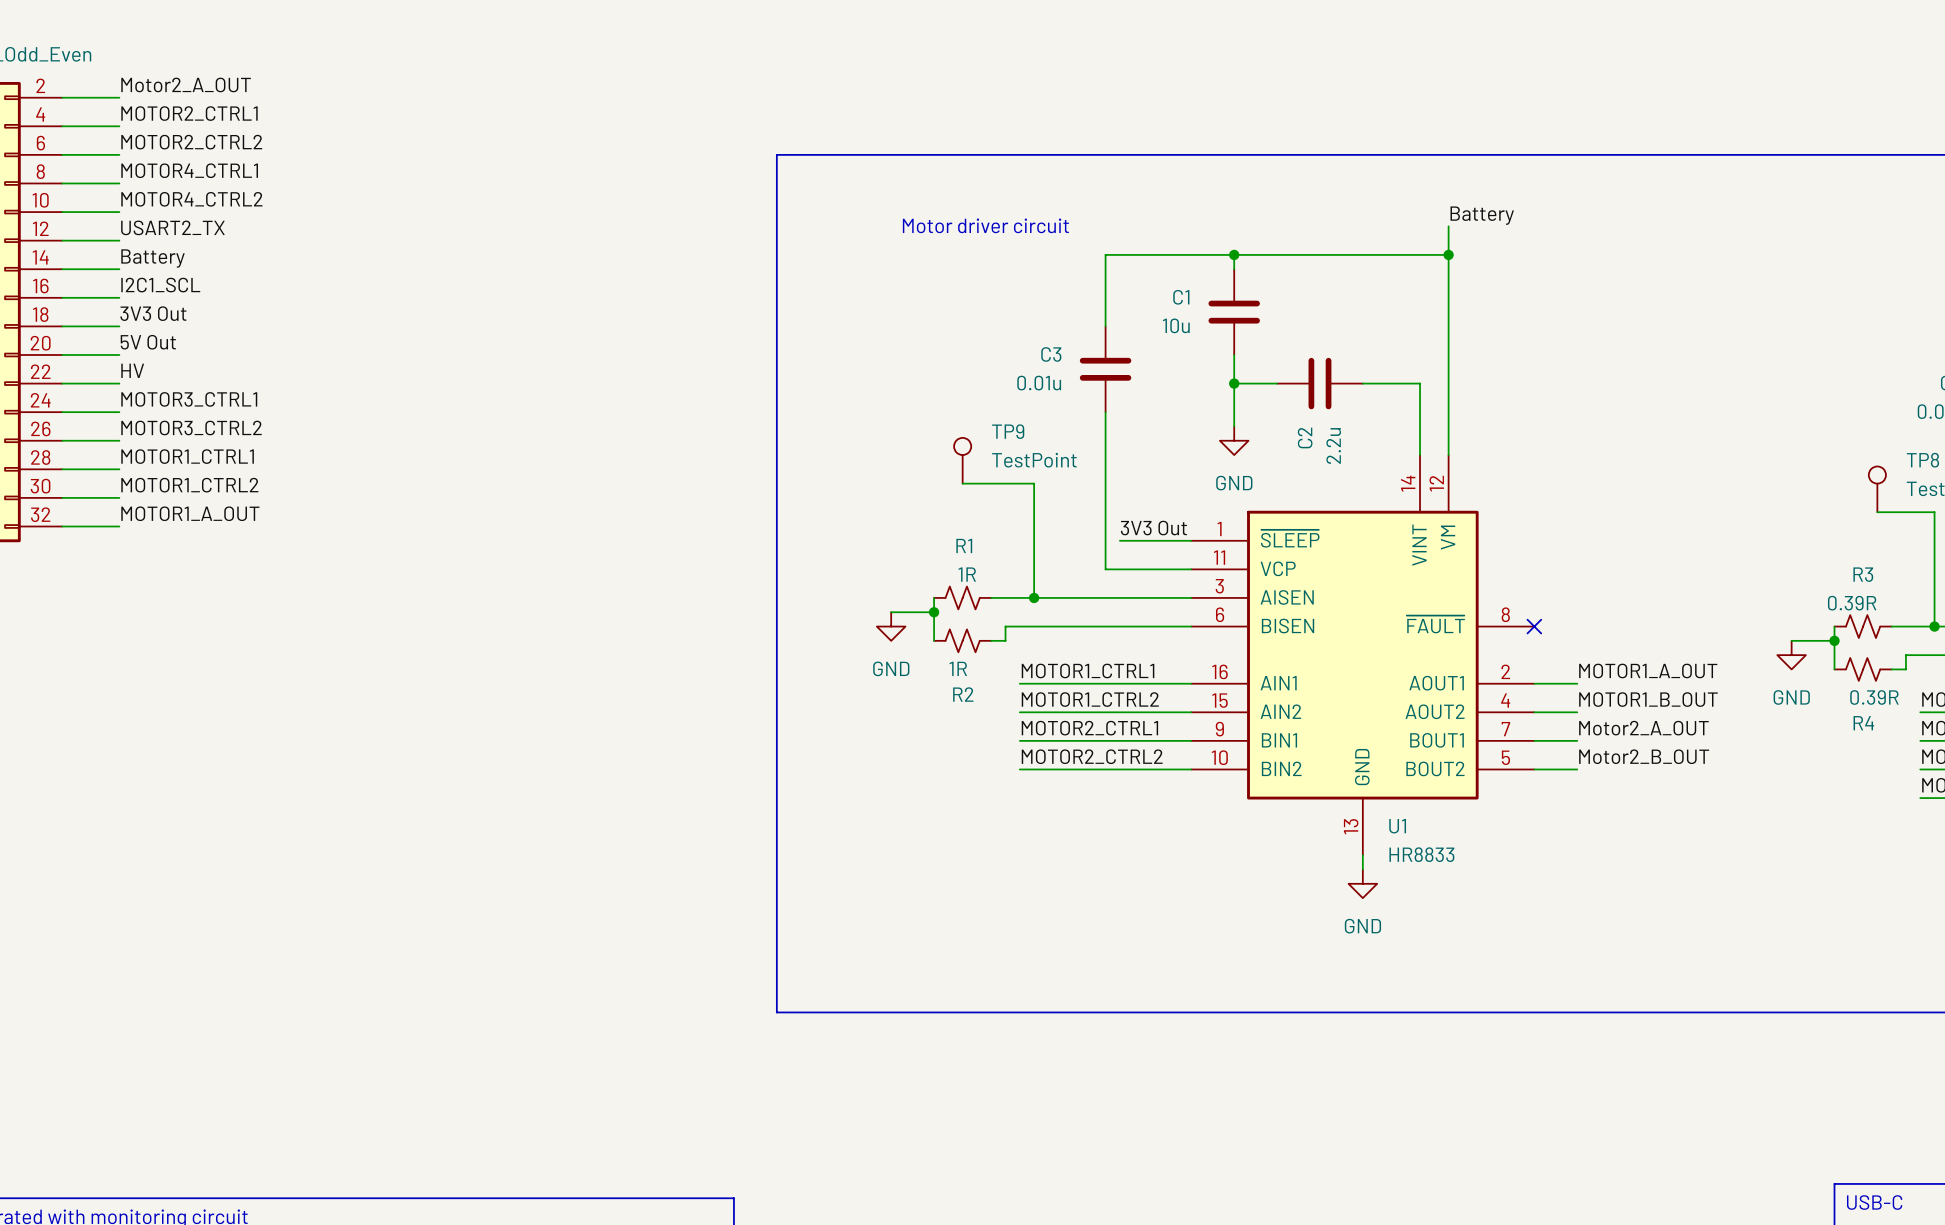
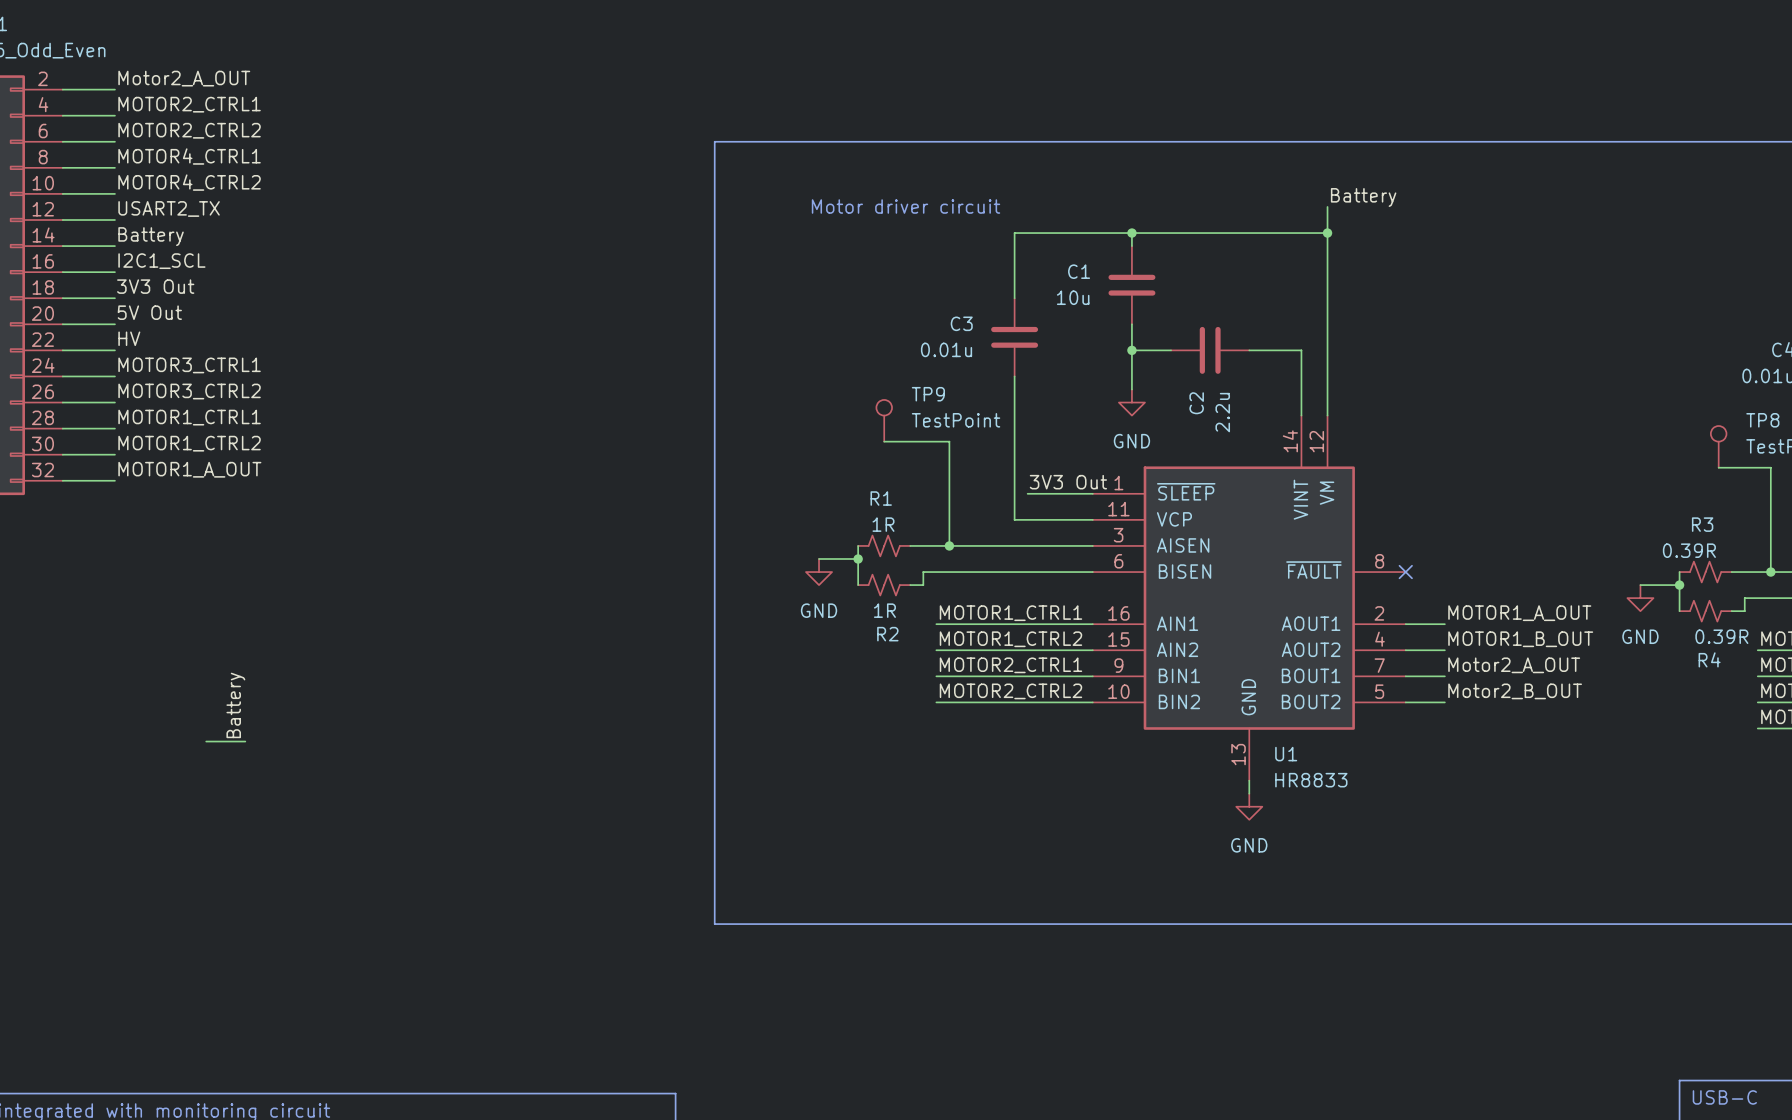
label: none -> Battery (235, 705)
wire: none -> (206, 741) (245, 741)

